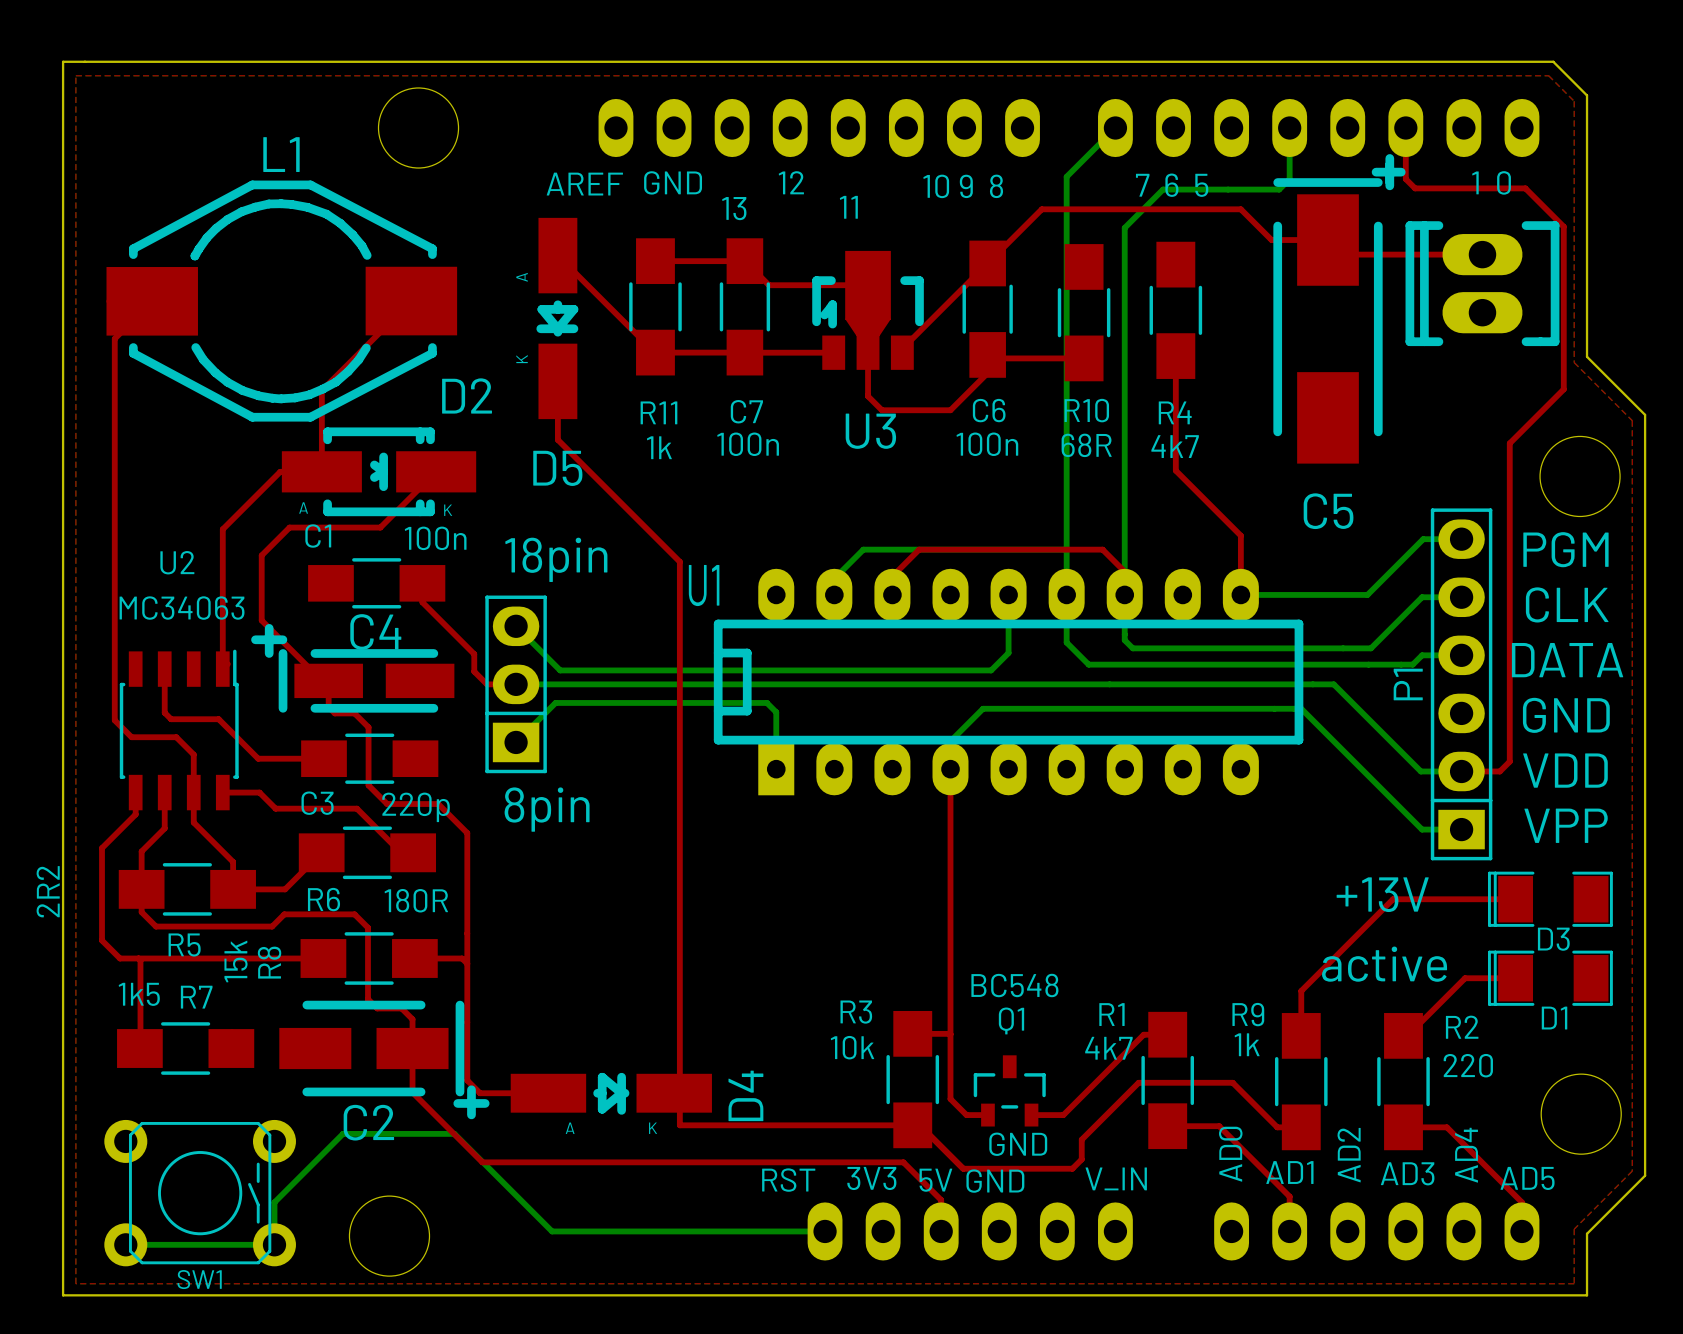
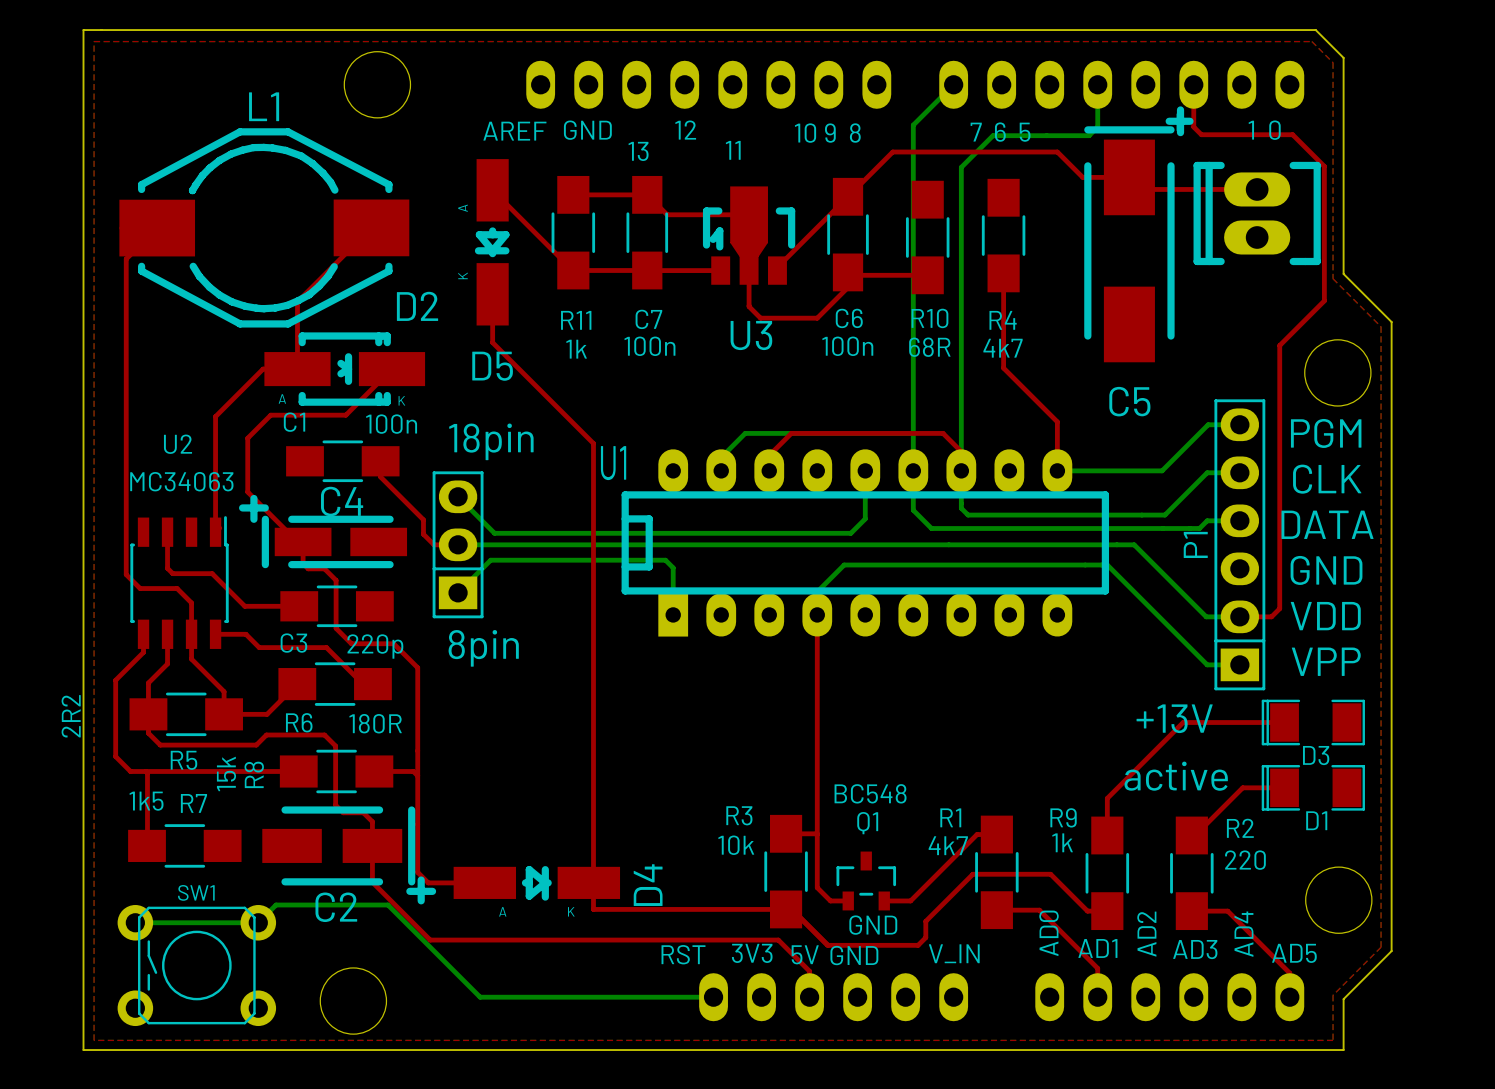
SW1 rotation: 0° (200, 1193) -> 180° (196, 965)
bottom track: (552, 1231) (454, 1133) (343, 1133) (274, 1202) (274, 1244) (125, 1244) -> (487, 997) (480, 997) (387, 905) (276, 905) (258, 922) (135, 922)

